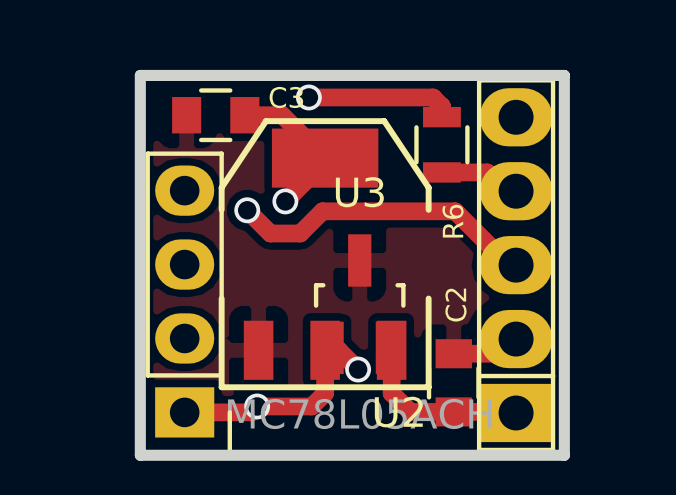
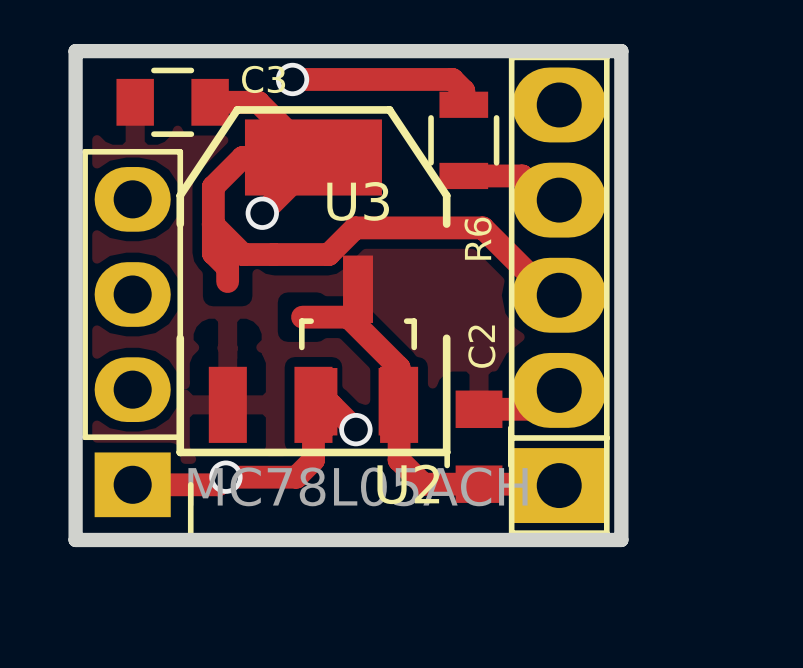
track: none -> (313, 157) (242, 157) (213, 186) (213, 253) (227, 267) (227, 281)
via: (247, 210) -> none
track: (456, 212) (322, 211) (300, 233) -> (482, 227) (355, 227) (328, 254) (281, 254)
track: none -> (302, 317) (348, 317) (399, 367) (399, 404)

